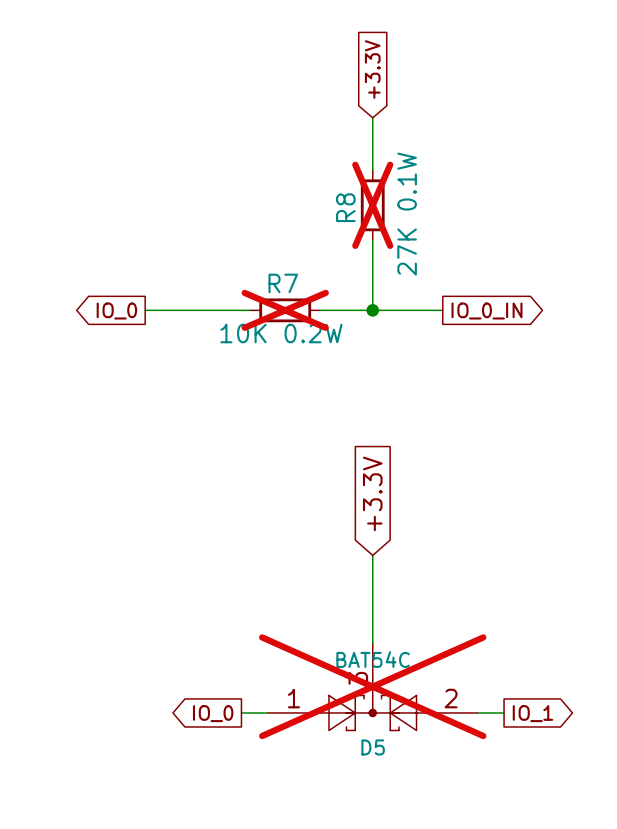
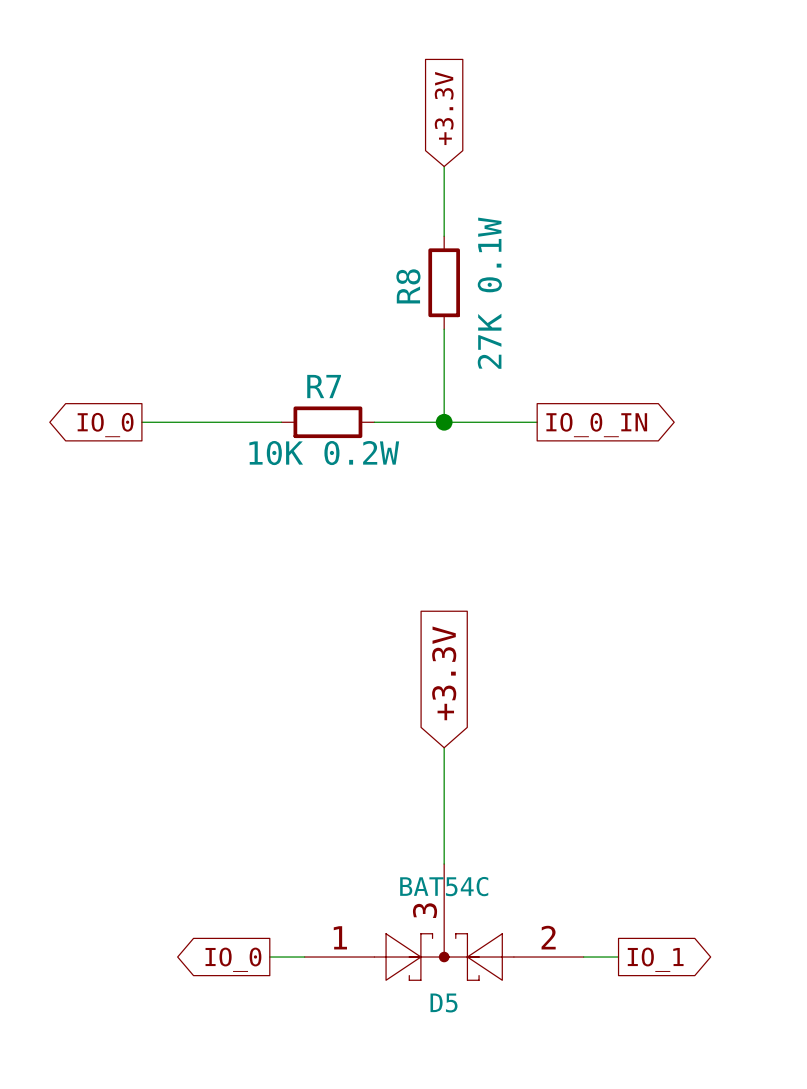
R8 do-not-place cross: (372, 205) -> none
R7 do-not-place cross: (285, 310) -> none
D5 do-not-place cross: (372, 686) -> none

